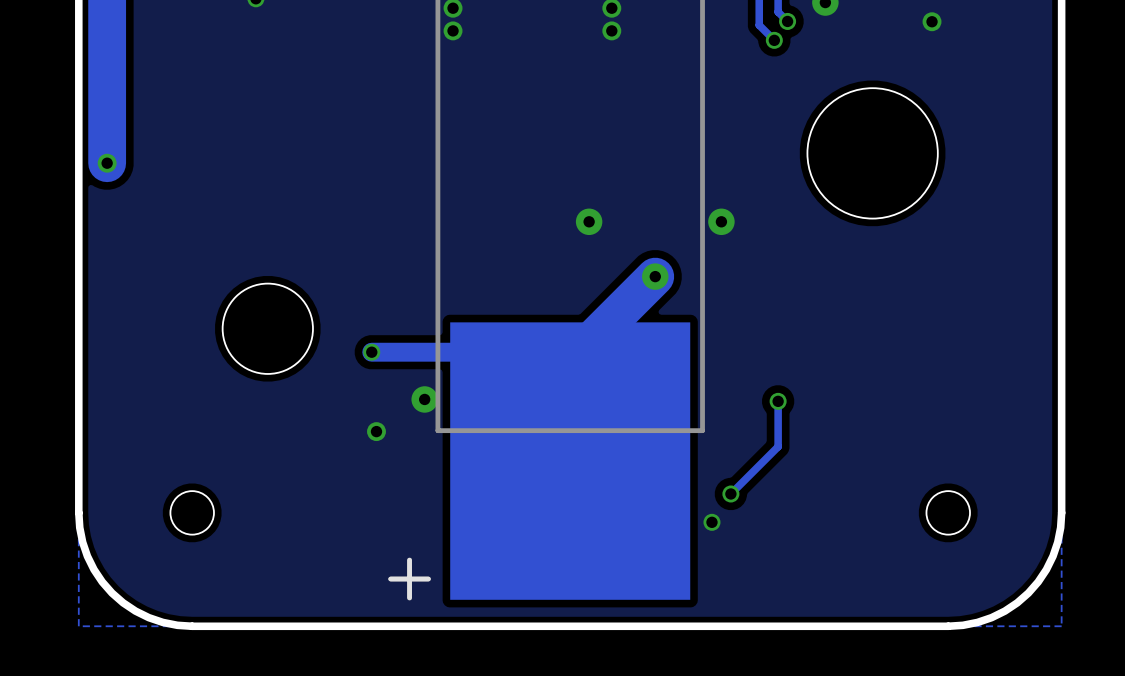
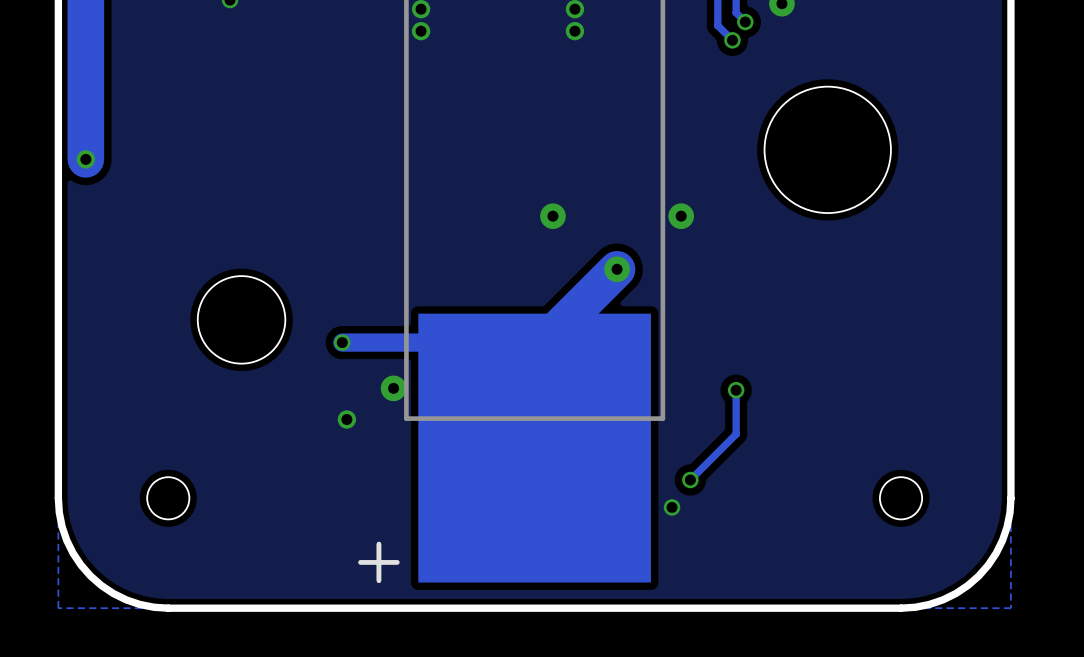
via: (932, 21) -> none

